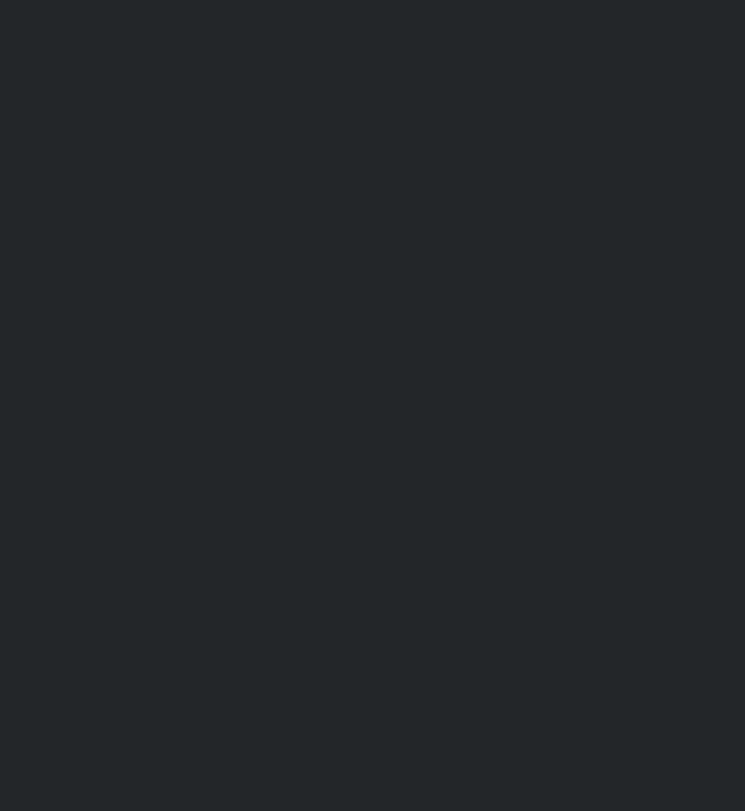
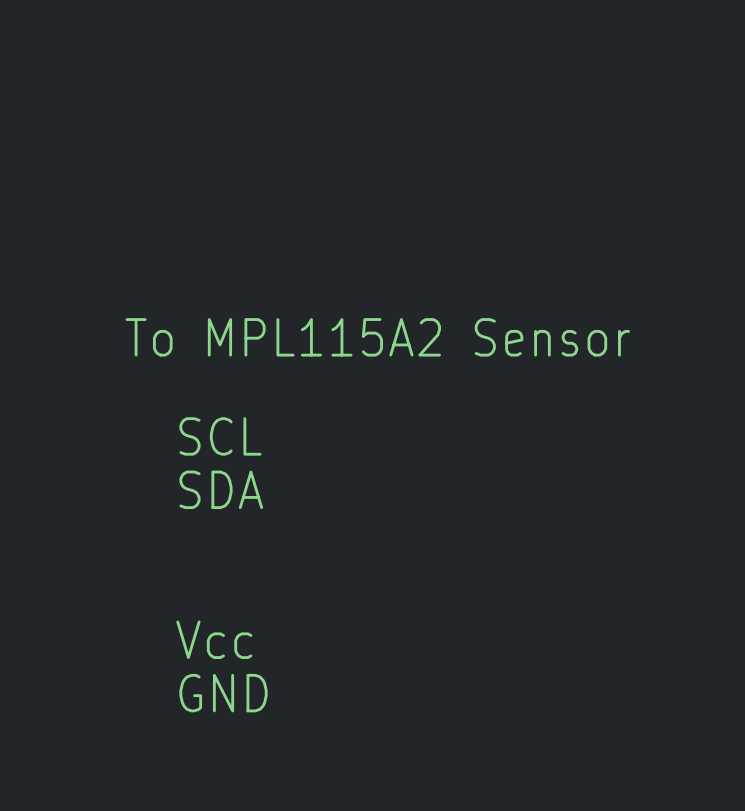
text: none -> To MPL115A2 Sensor (377, 337)
text: none -> SCL (220, 436)
text: none -> SDA (221, 489)
text: none -> Vcc (214, 639)
text: none -> GND (223, 693)

